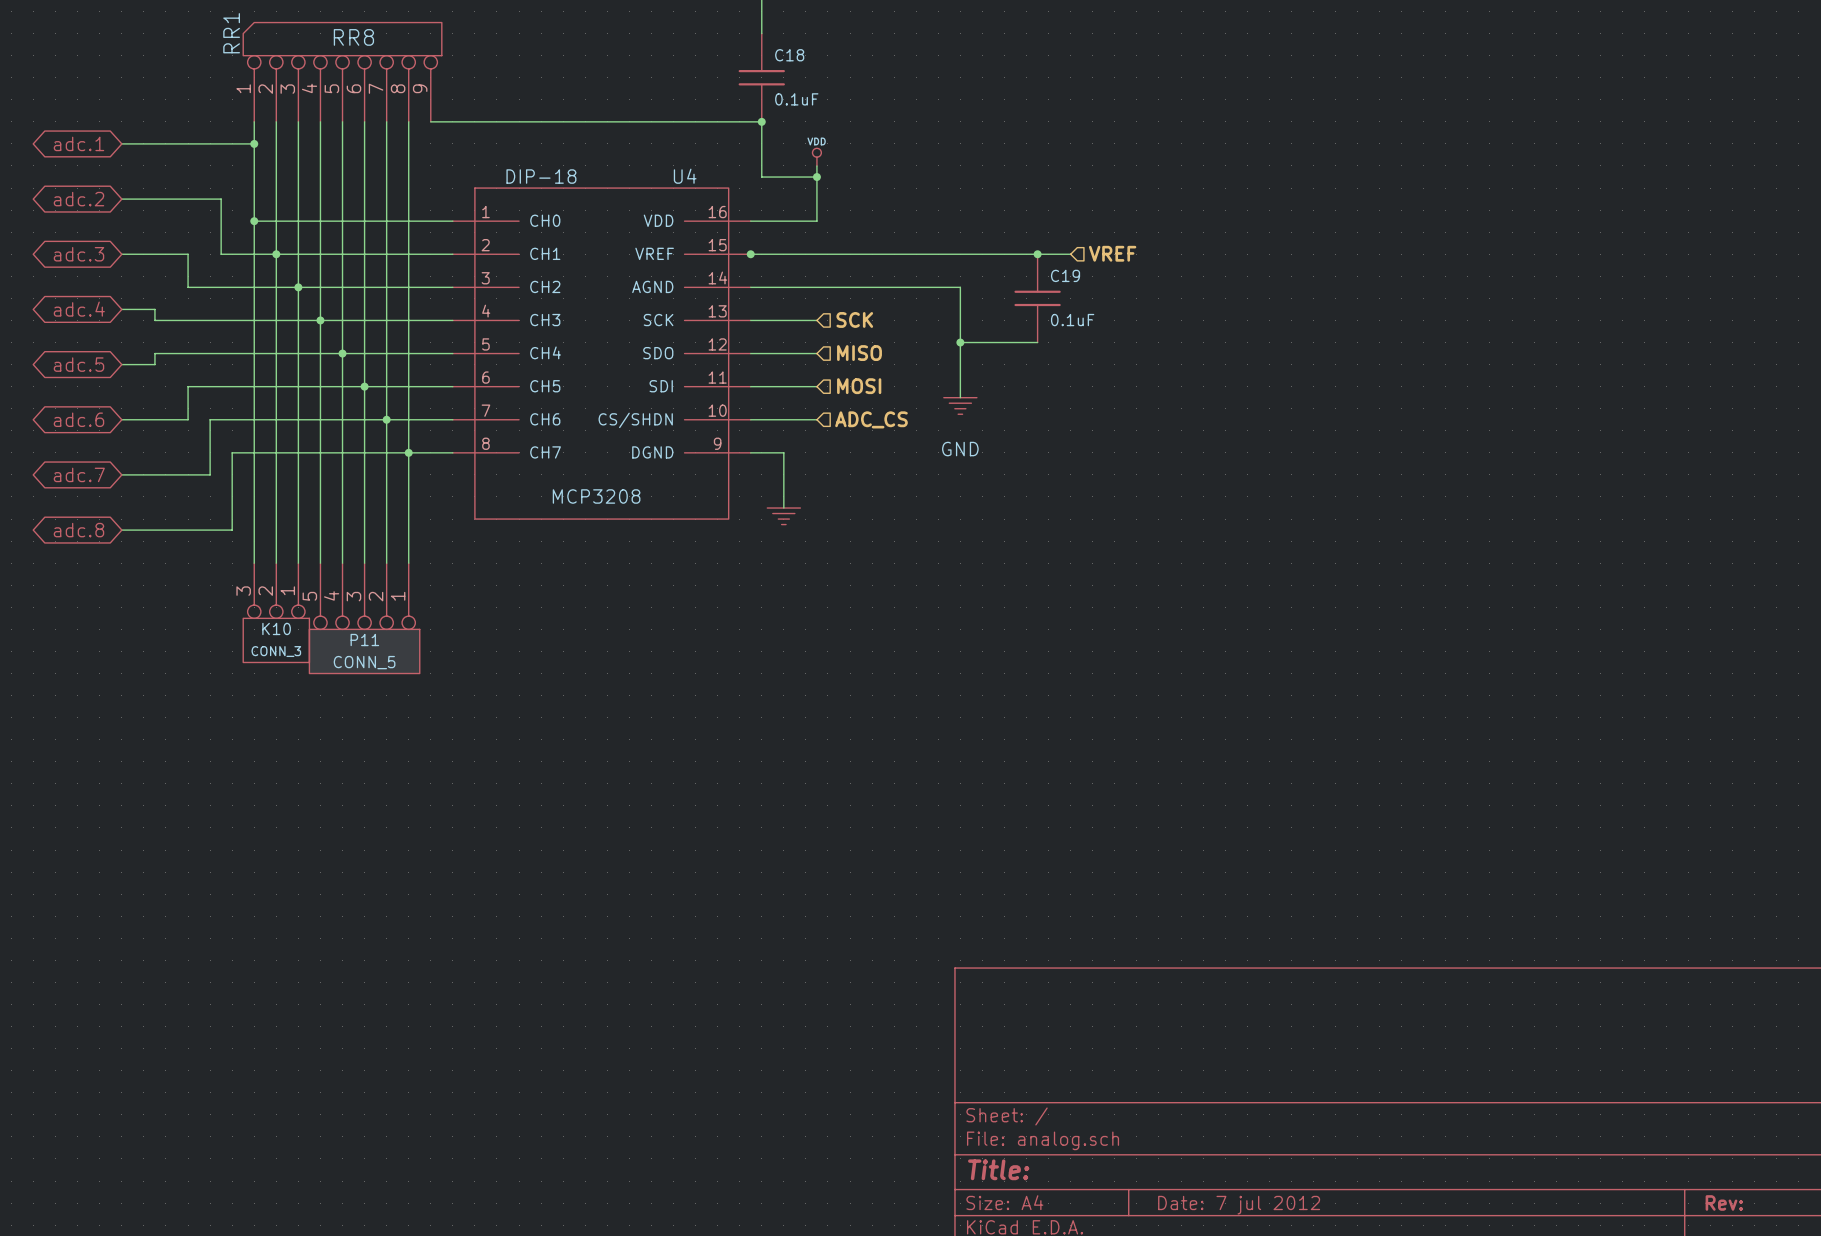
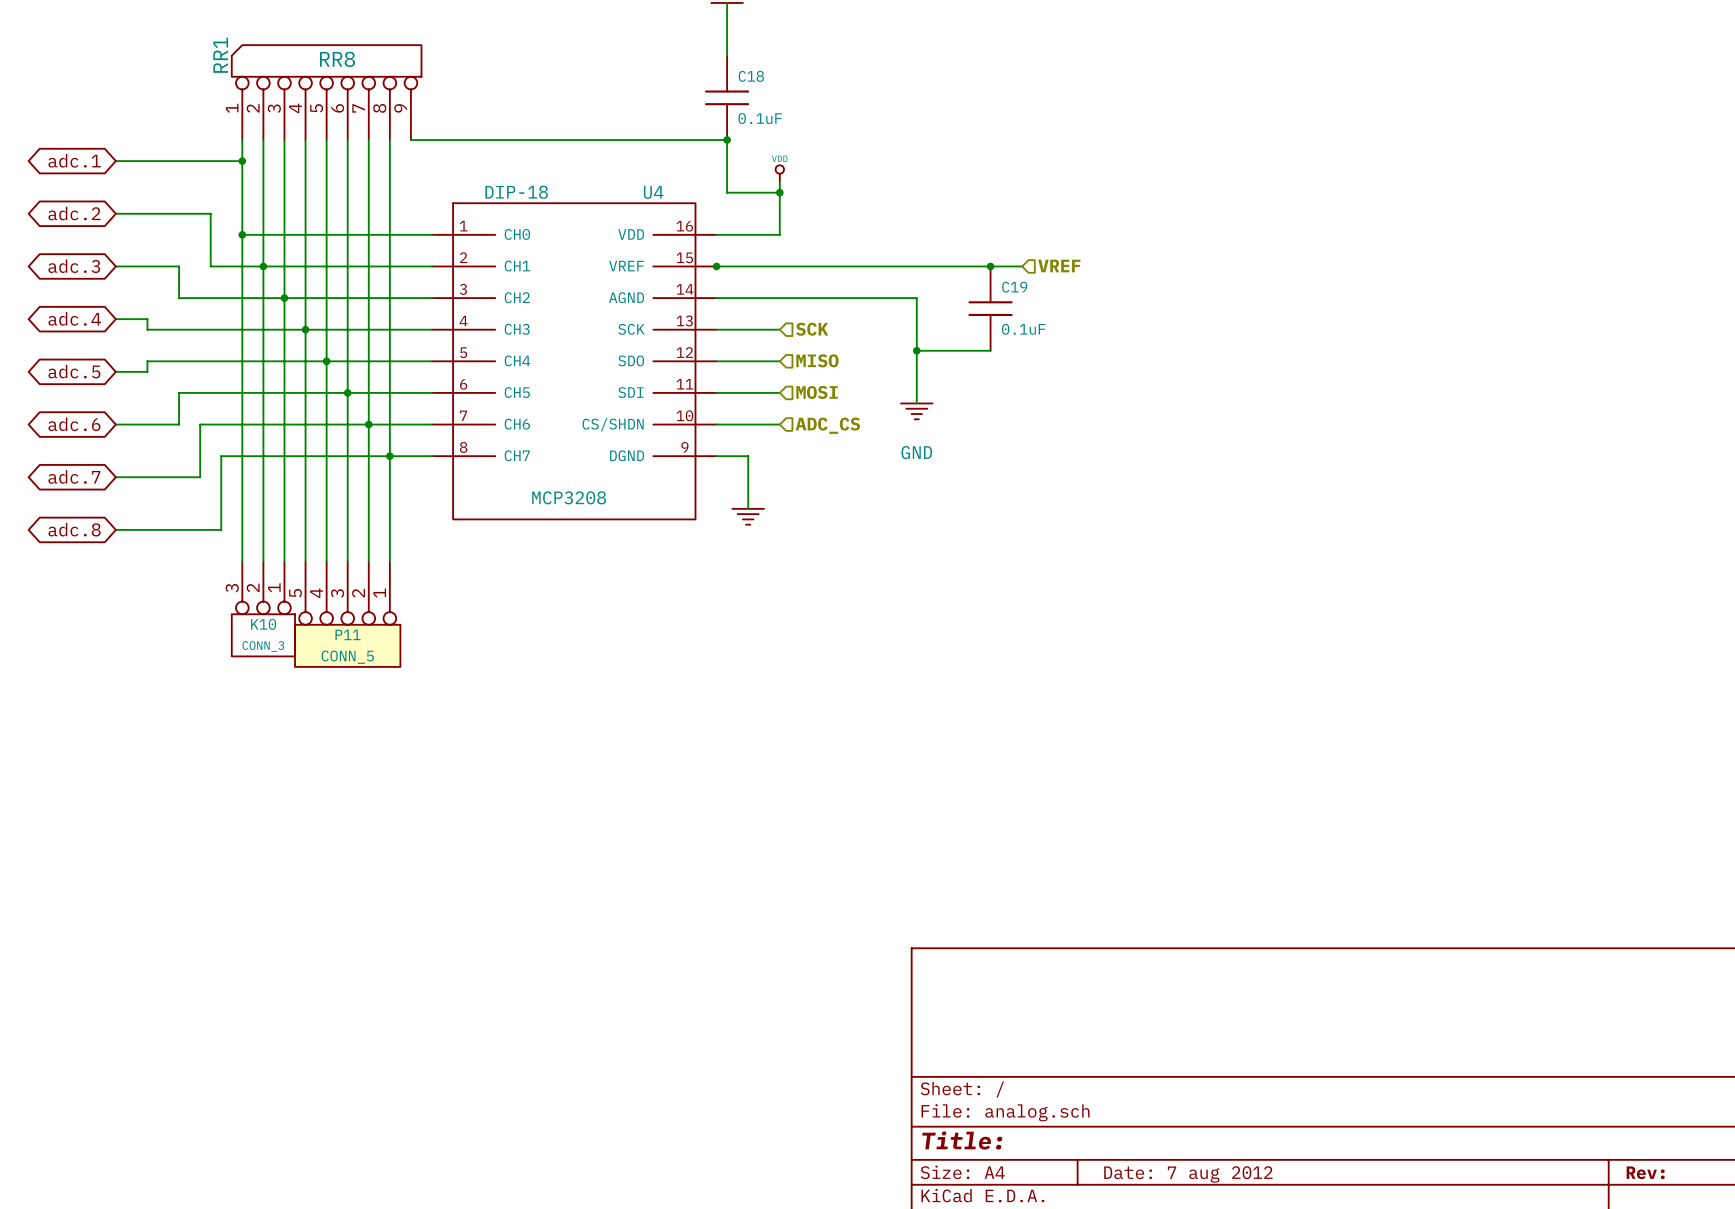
title block: Date: 7 jul 2012 (1239, 1205) -> Date: 7 aug 2012 (1188, 1174)

